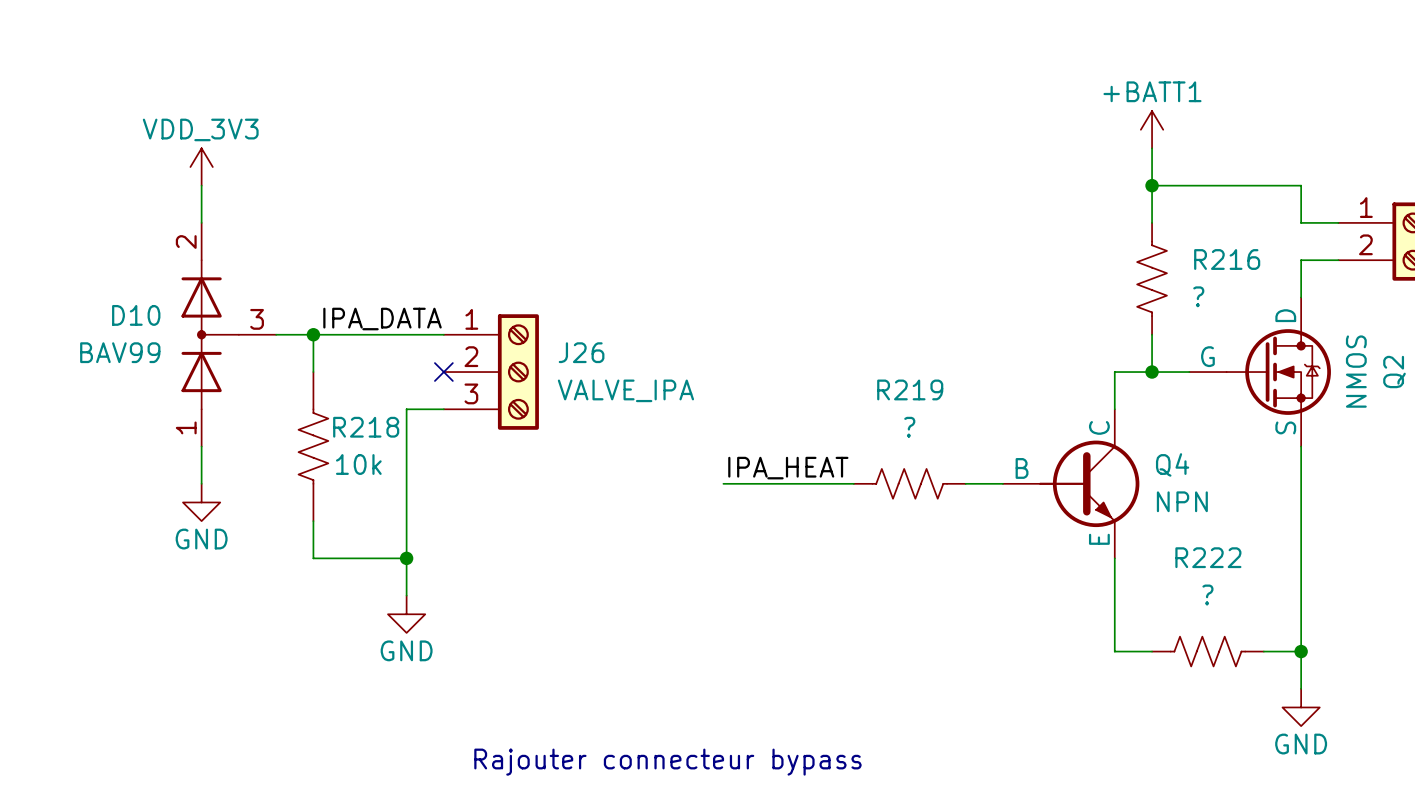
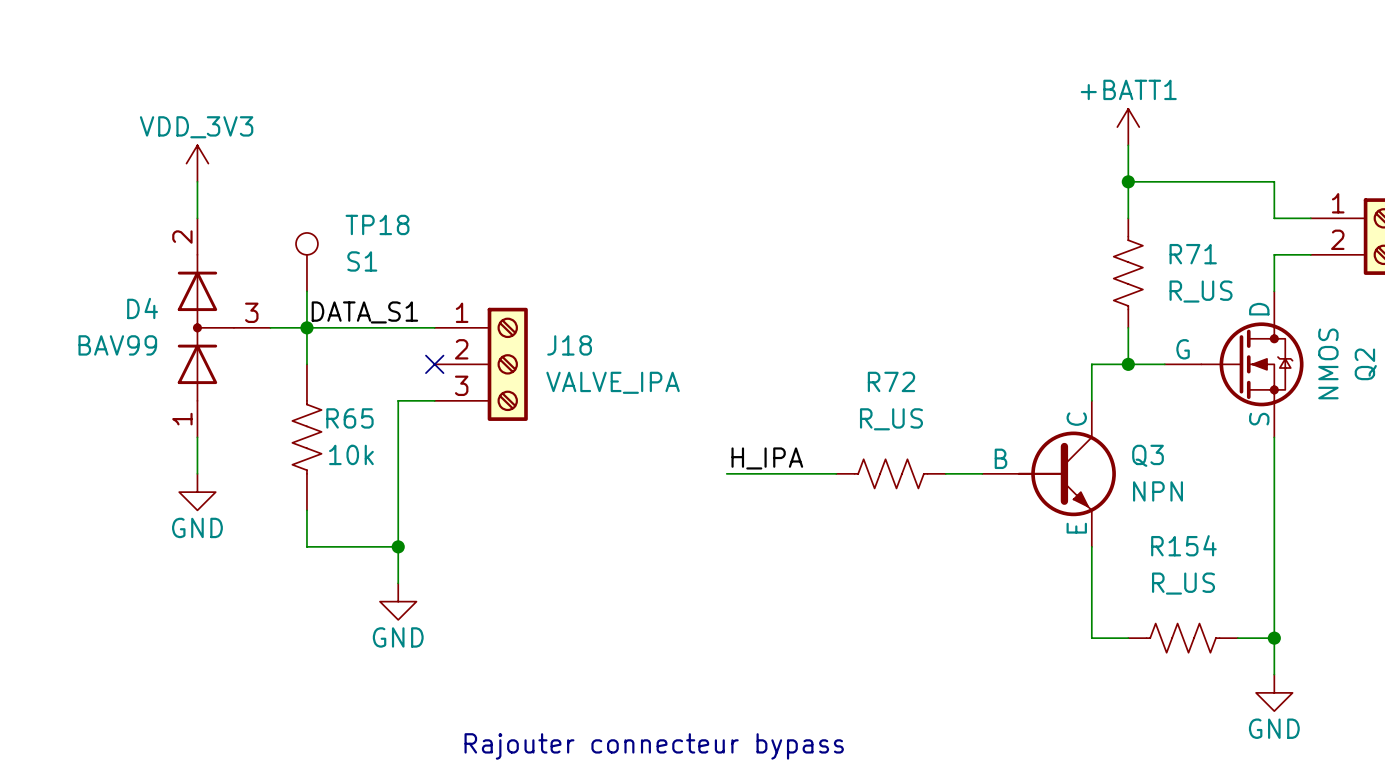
R216 name: R216 (1227, 259) -> R71 (1193, 254)
TP18: none -> S1 (306, 262)
R216 value: ? (1198, 296) -> R_US (1201, 291)
wire: none -> (306, 291) (306, 327)
D10 name: D10 (136, 315) -> D4 (142, 308)
label: none -> DATA_S1 (364, 312)
label: IPA_DATA (382, 319) -> none
J26 name: J26 (581, 352) -> J18 (569, 345)
R219 name: R219 (910, 389) -> R72 (891, 381)
R218 name: R218 (366, 427) -> R65 (349, 418)
R219 value: ? (909, 427) -> R_US (891, 419)
Q4 name: Q4 (1172, 464) -> Q3 (1148, 455)
label: none -> H_IPA (767, 458)
label: IPA_HEAT (788, 468) -> none
wire: (723, 483) (742, 483) -> none
R222 name: R222 (1208, 557) -> R154 (1183, 545)
R222 value: ? (1207, 594) -> R_US (1183, 583)

